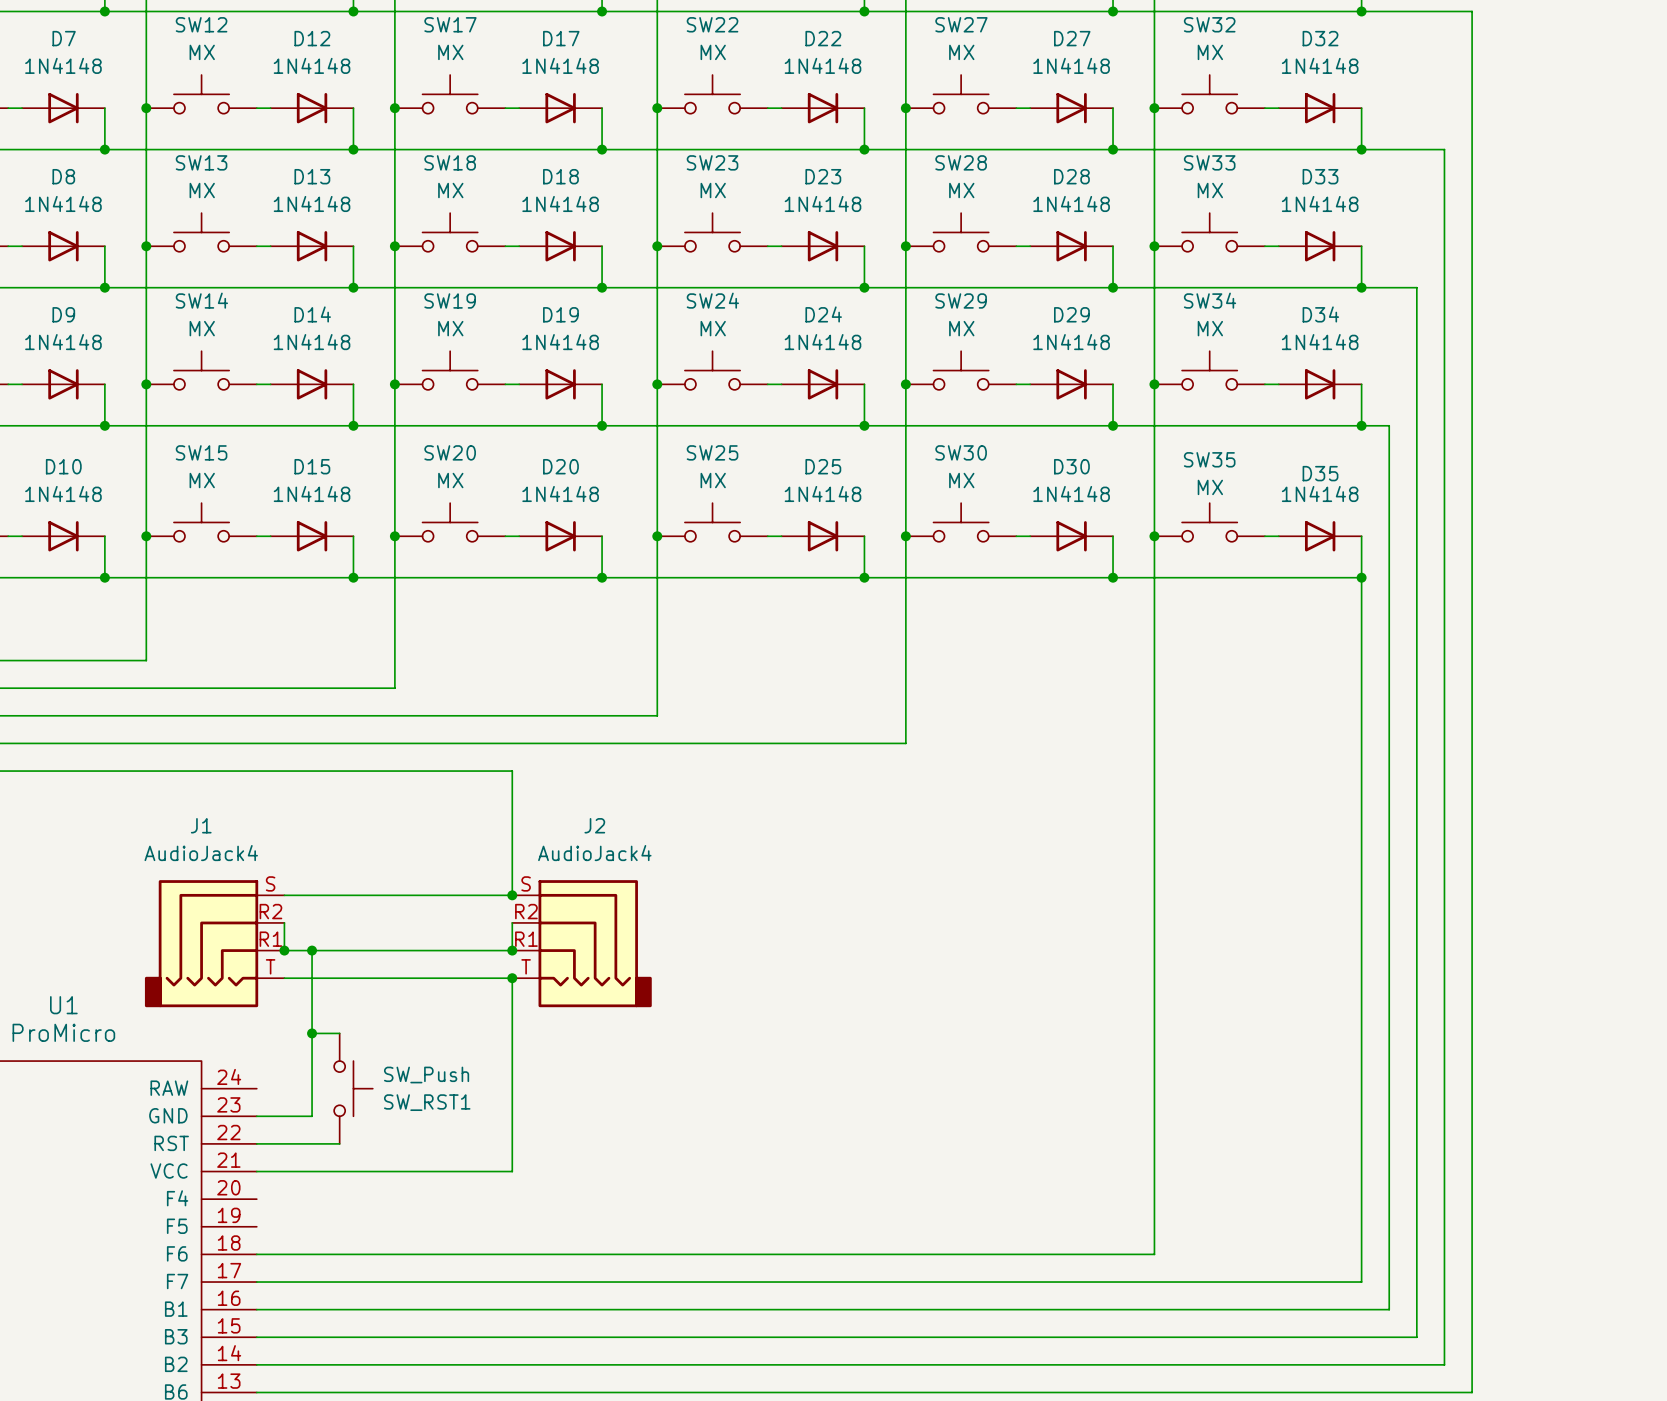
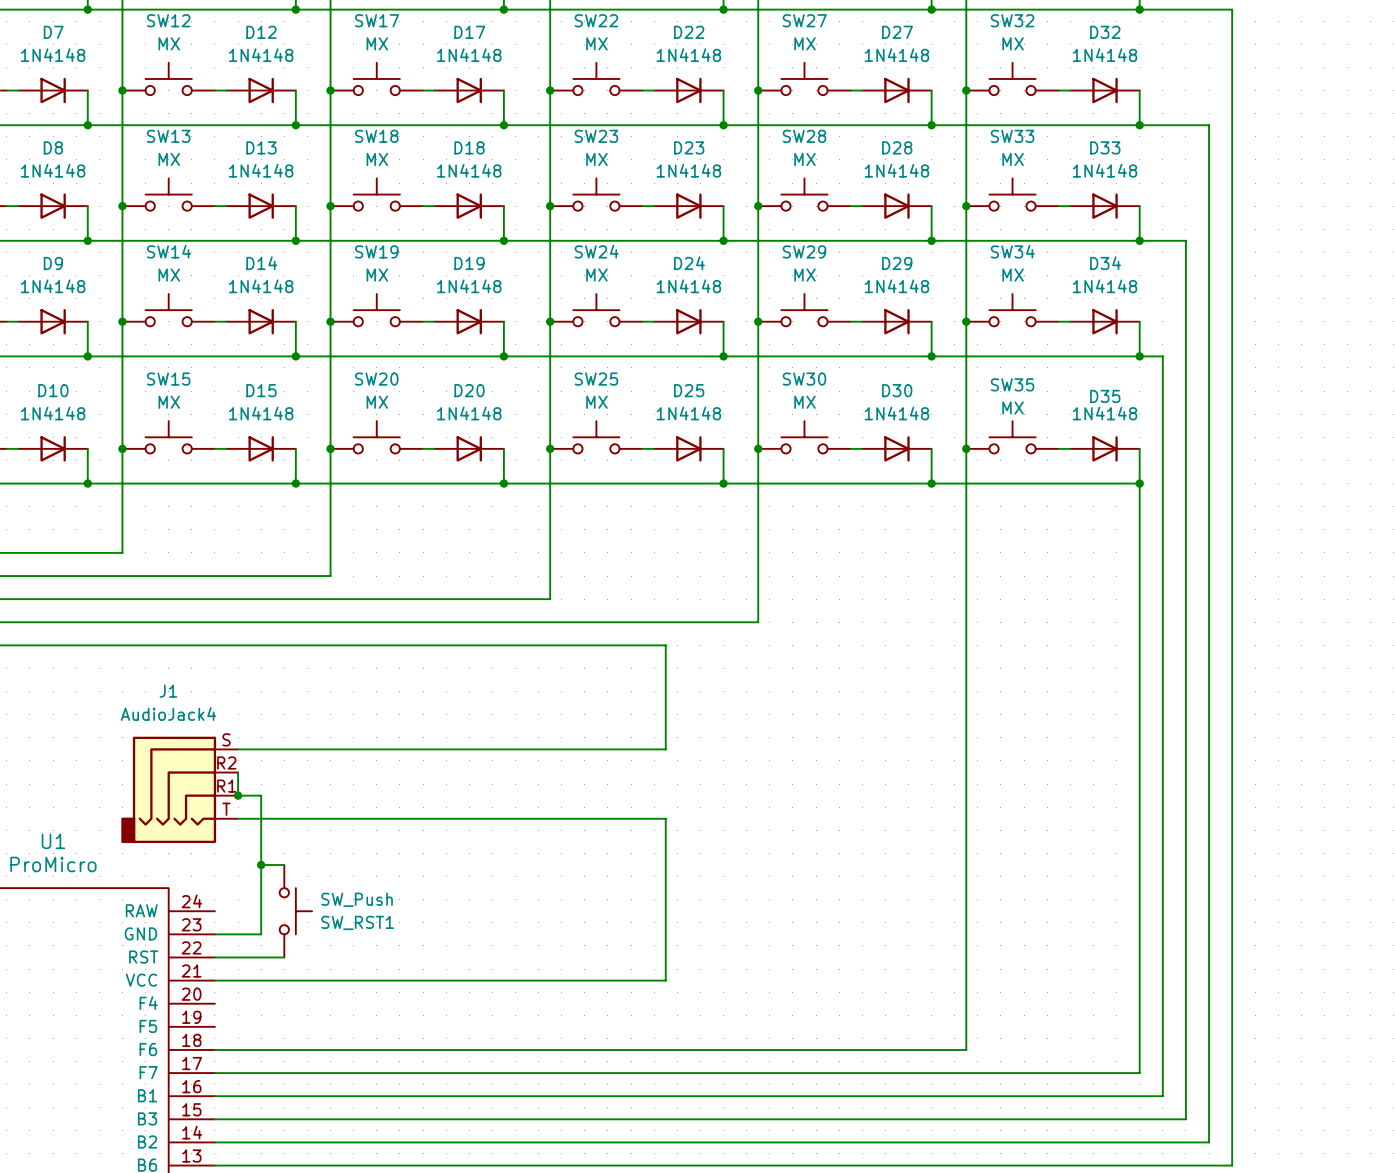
wire: (512, 771) (512, 895) -> (428, 645) (665, 645) (665, 749) (428, 749)
junction: (512, 895) -> none
wire: (512, 922) (512, 950) (312, 950) -> none
J2: AudioJack4 (582, 943) -> none
junction: (312, 950) -> none
junction: (512, 950) -> none
wire: (512, 978) (512, 1171) -> (428, 818) (665, 818) (665, 980) (428, 980)
junction: (512, 978) -> none

